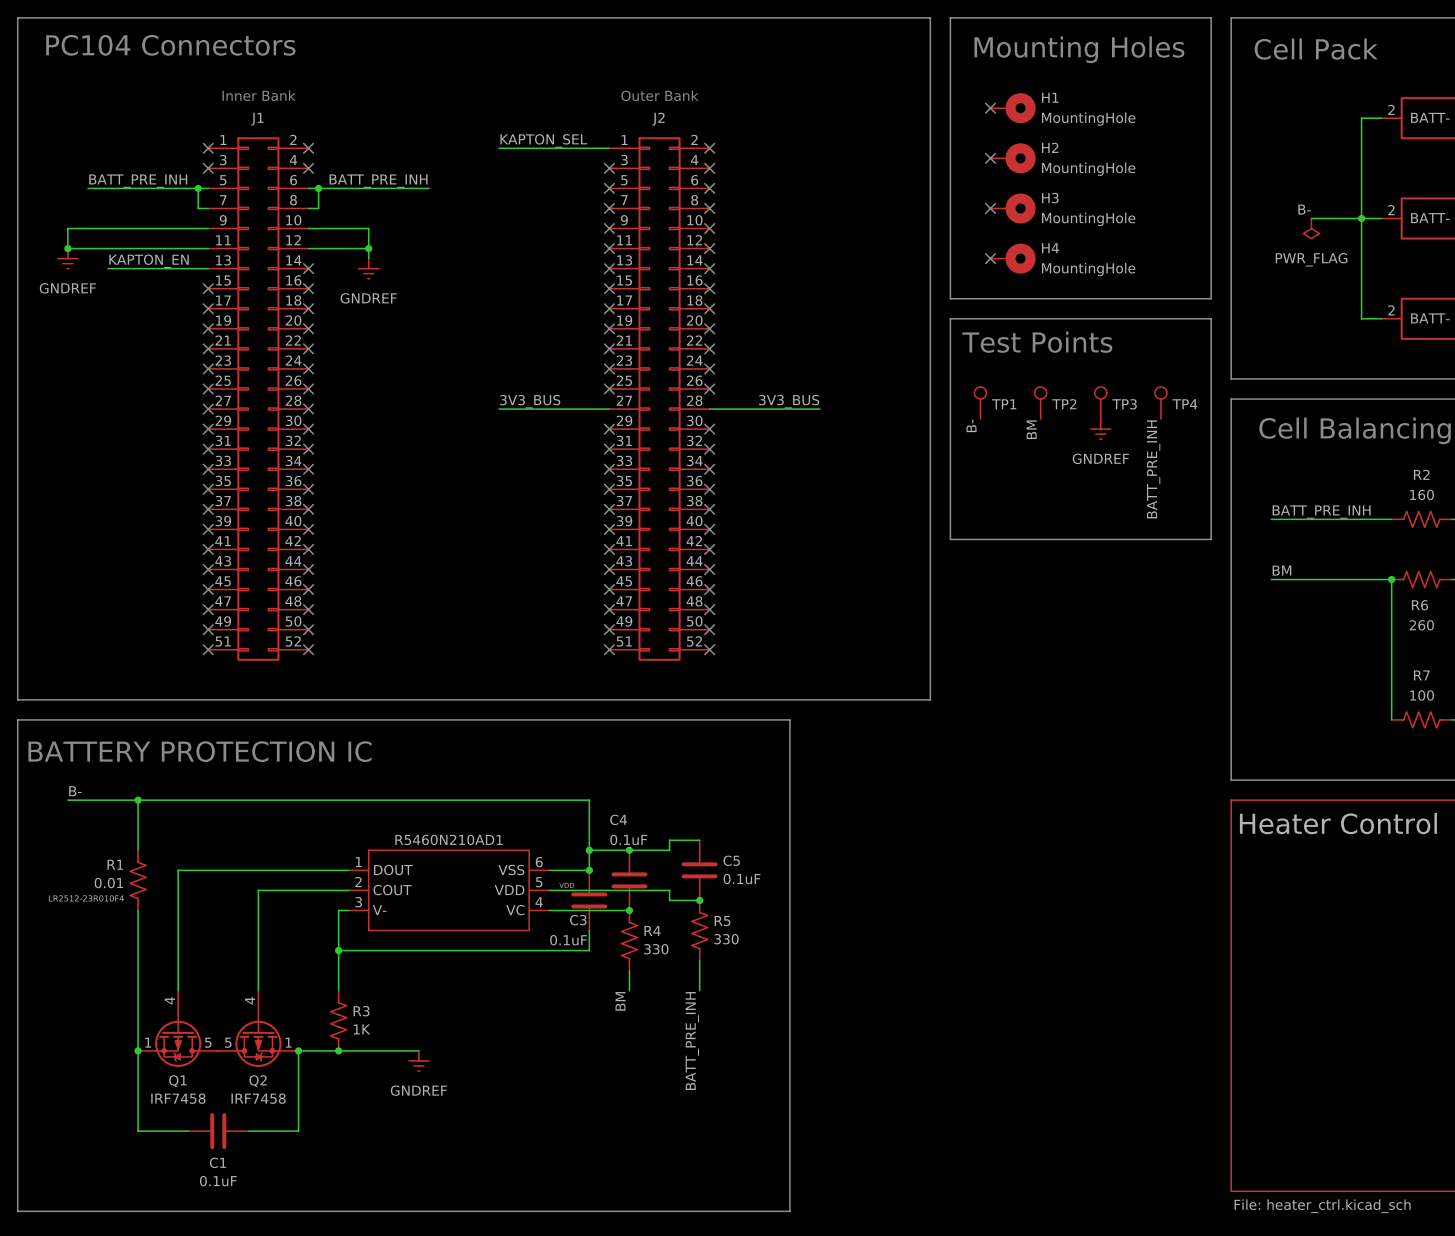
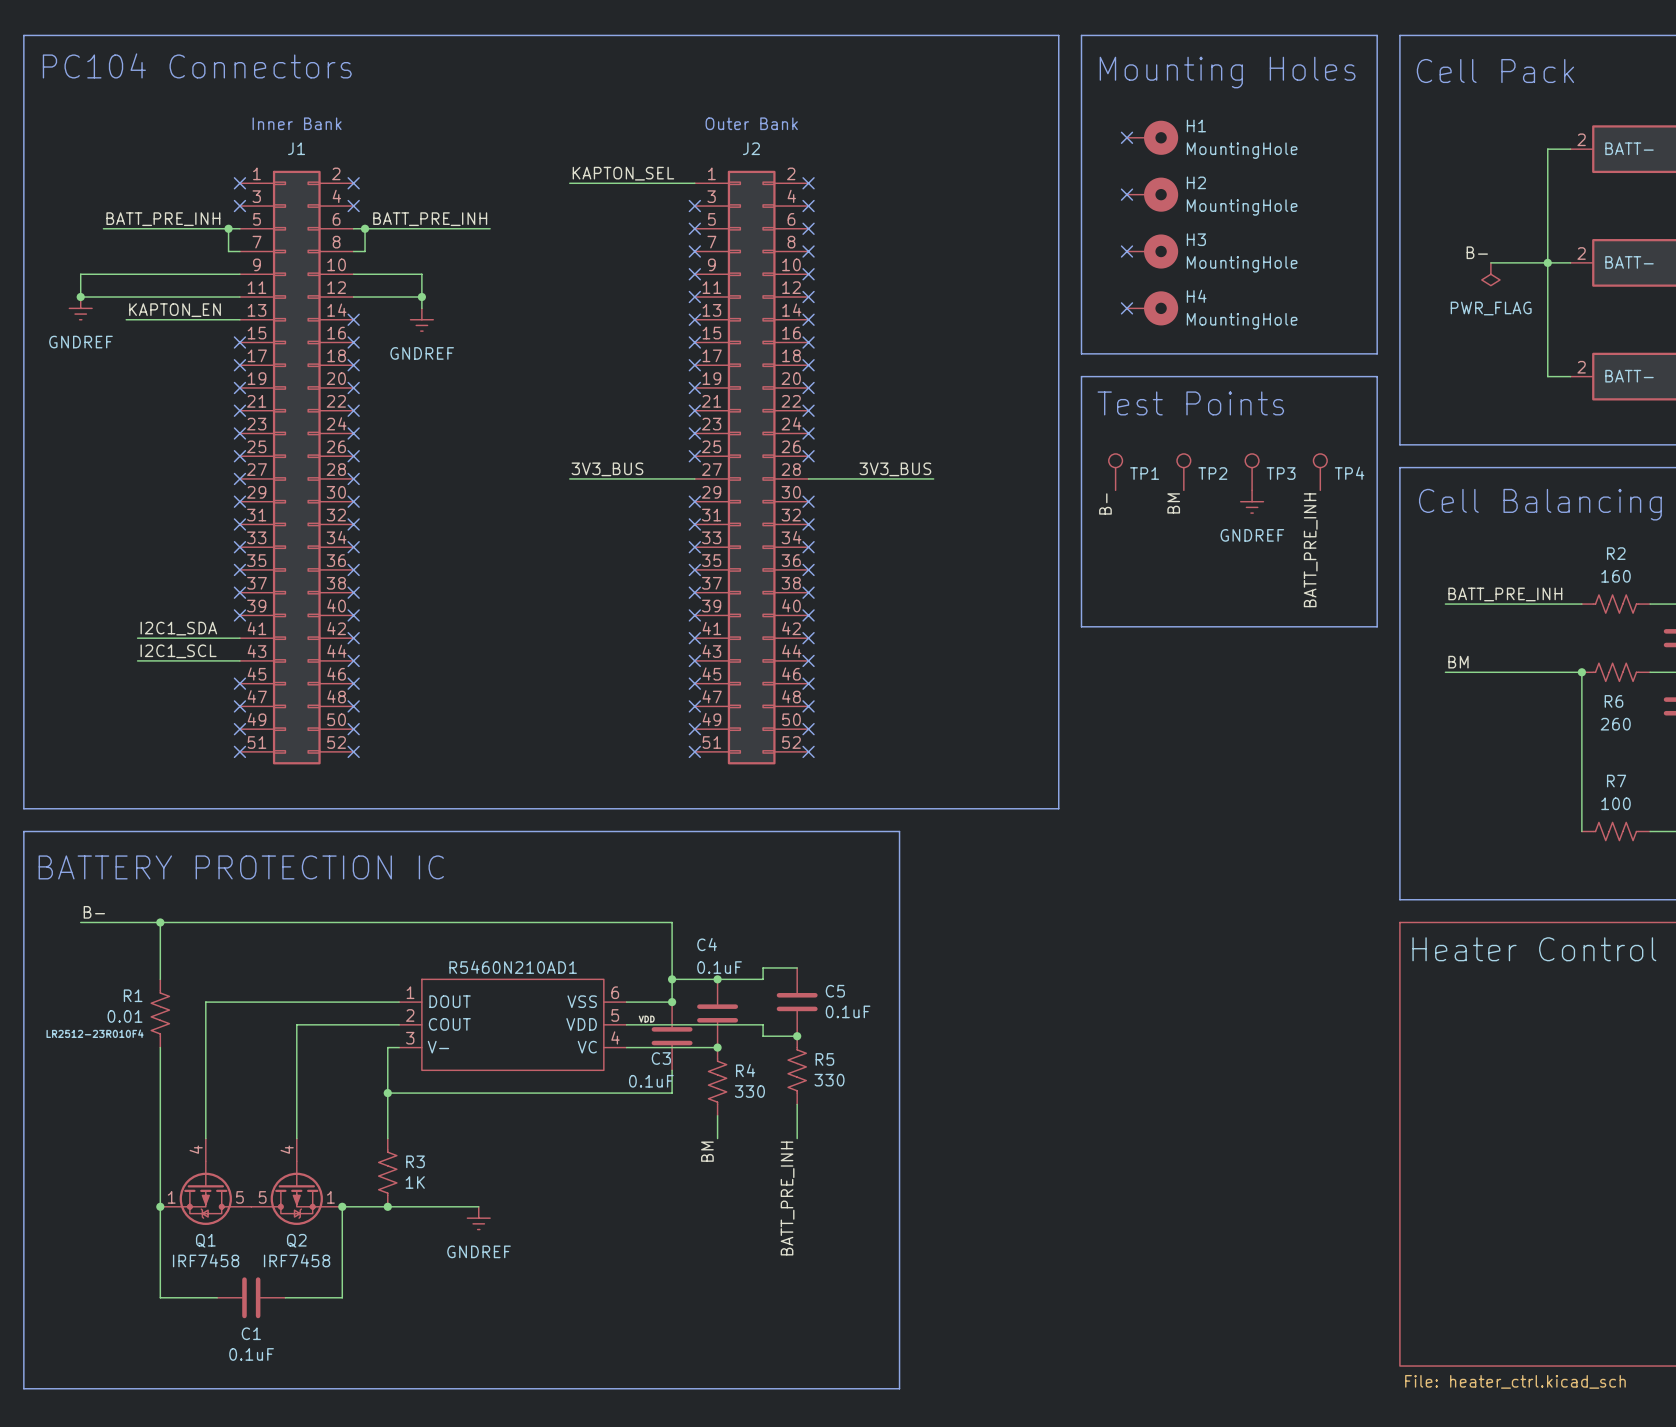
label: none -> I2C1_SDA (178, 628)
wire: none -> (137, 638) (239, 638)
no-connect mark: (208, 549) -> none
label: none -> I2C1_SCL (178, 651)
wire: none -> (137, 660) (239, 660)
no-connect mark: (208, 569) -> none

